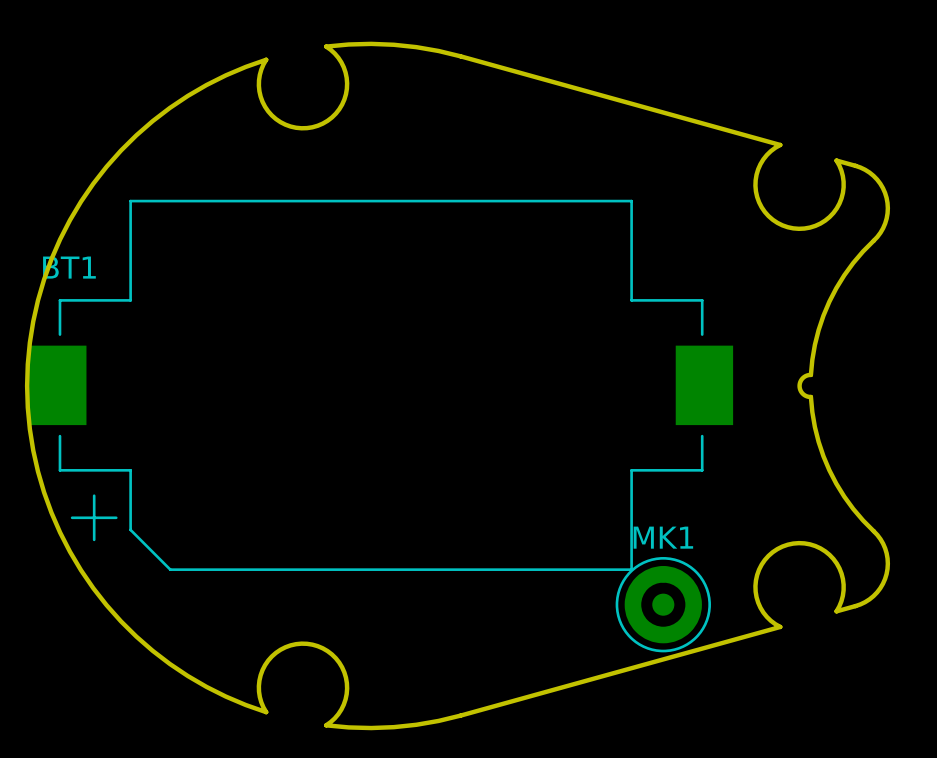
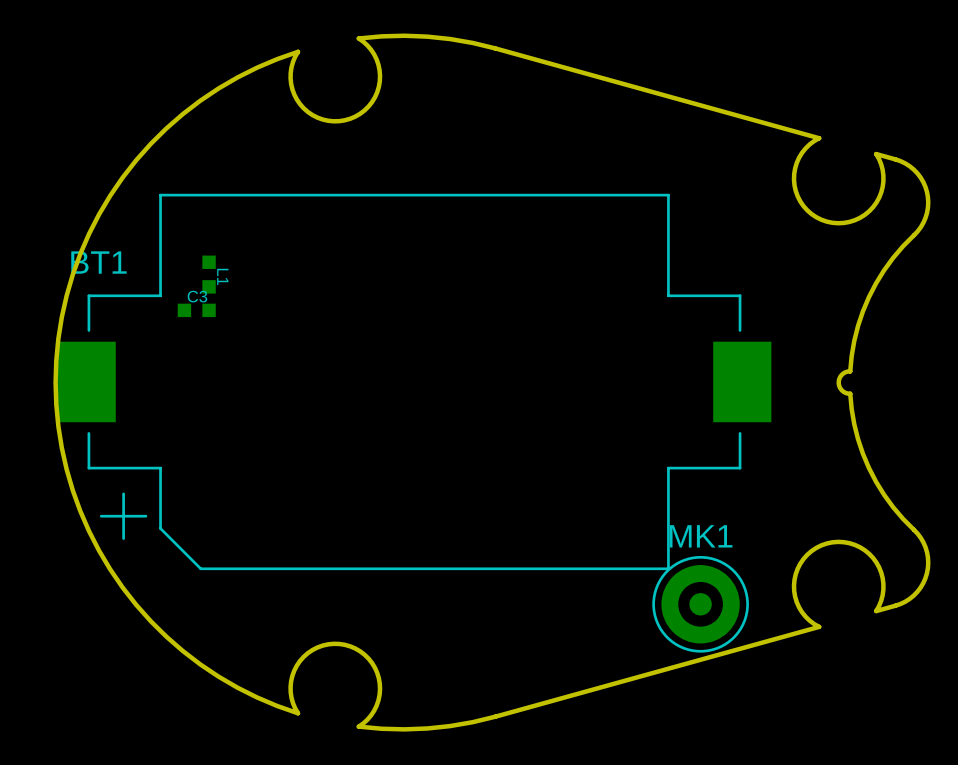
L1: none -> (209, 274)
C3: none -> (196, 310)

